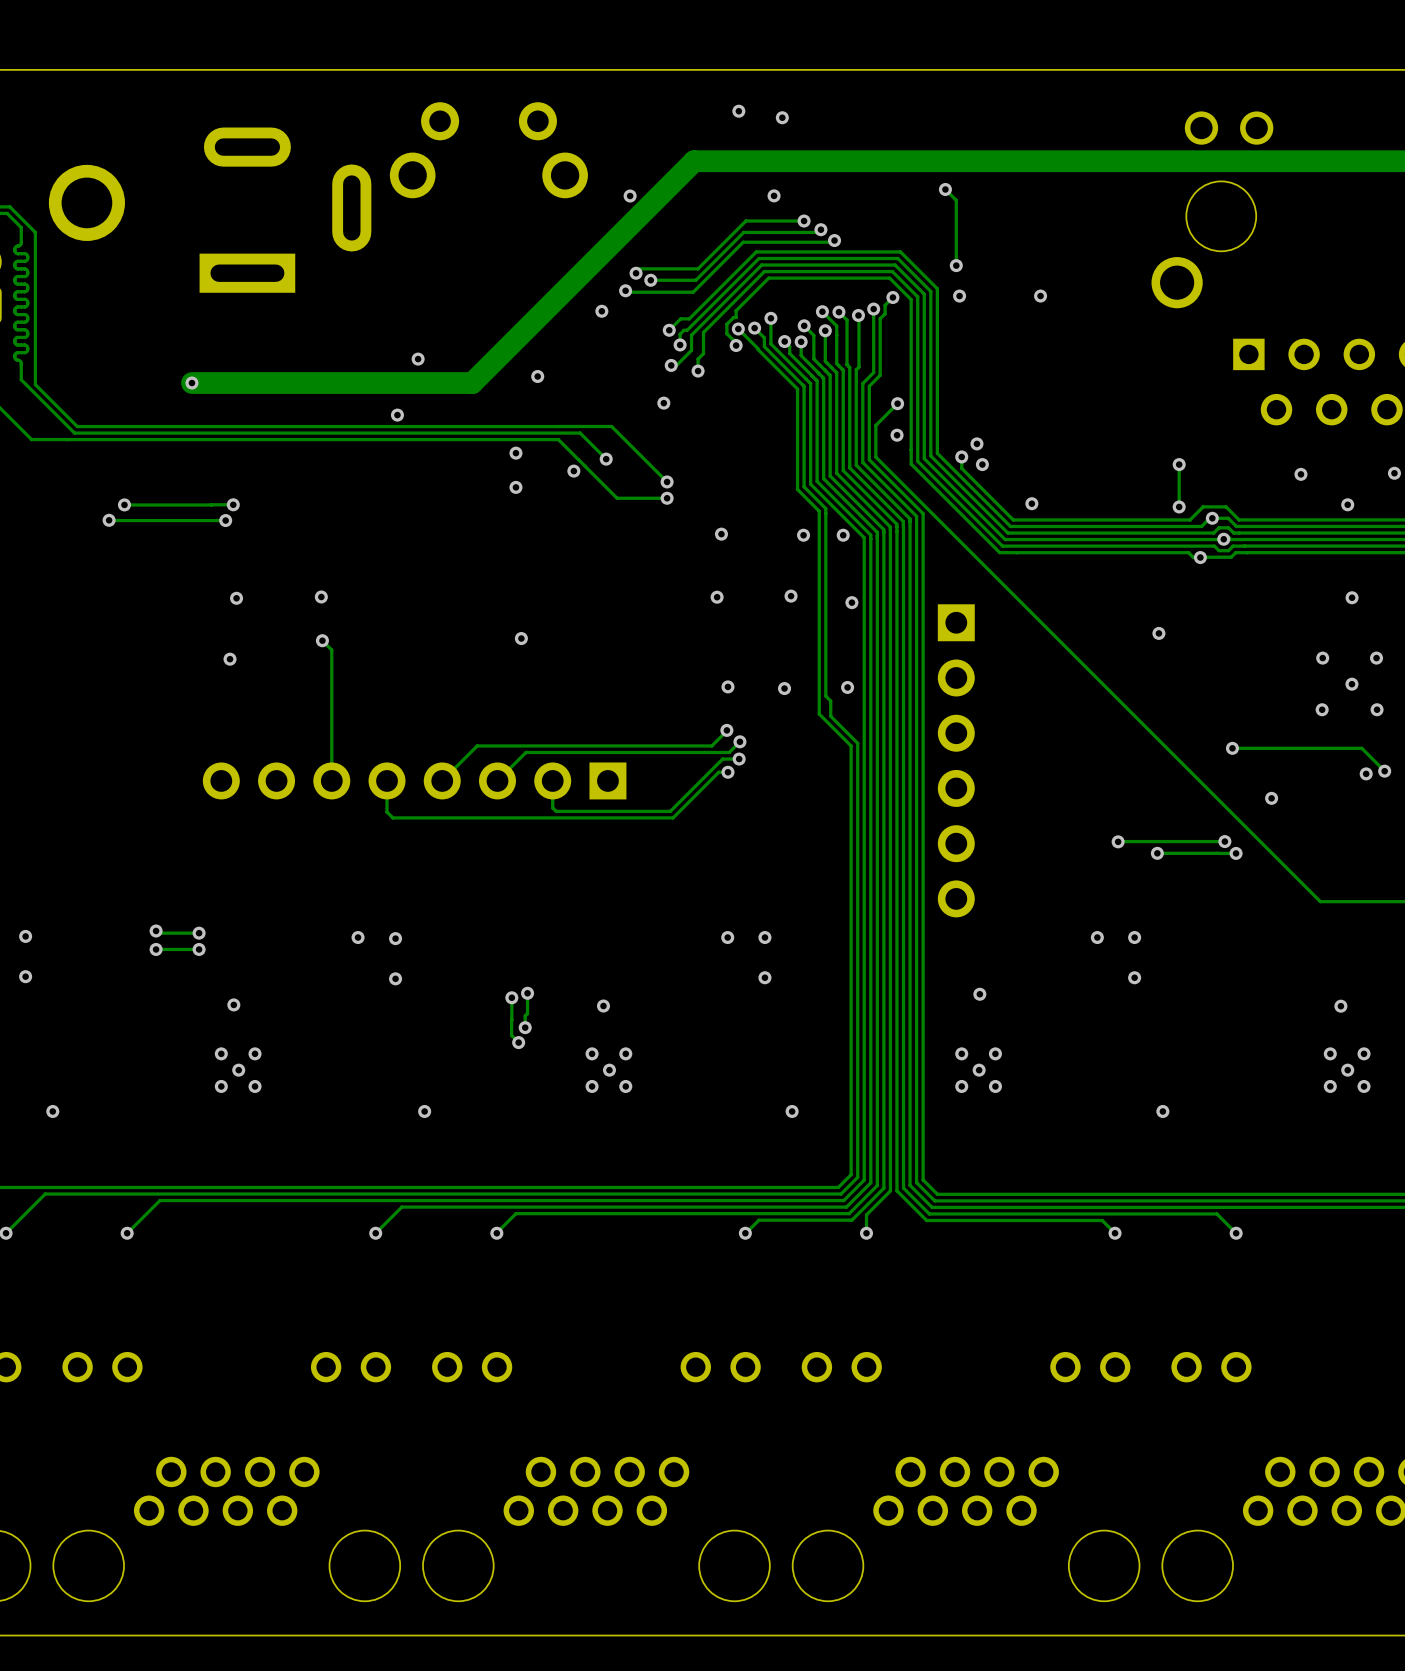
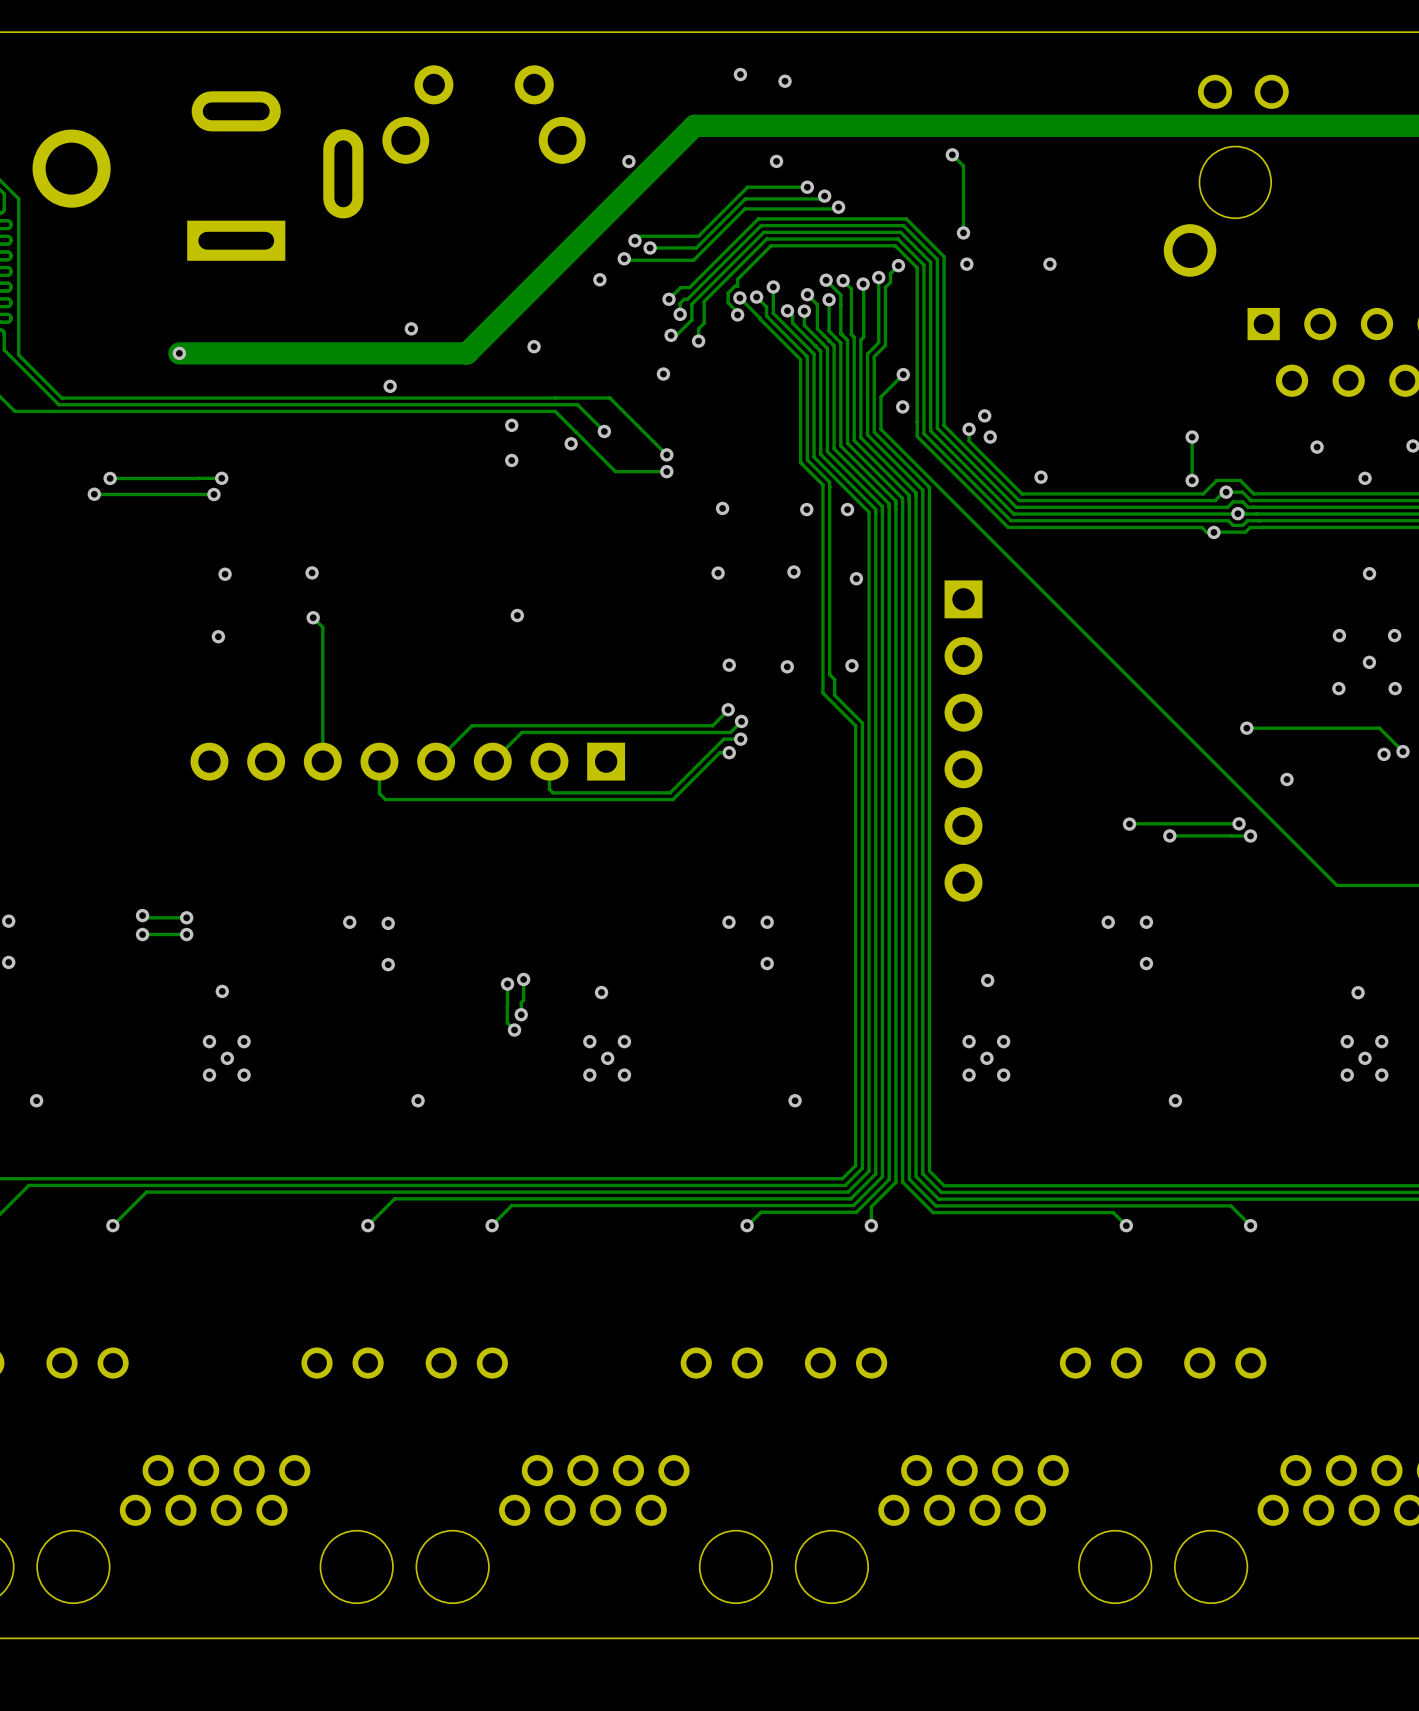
via: (1158, 633) -> none

